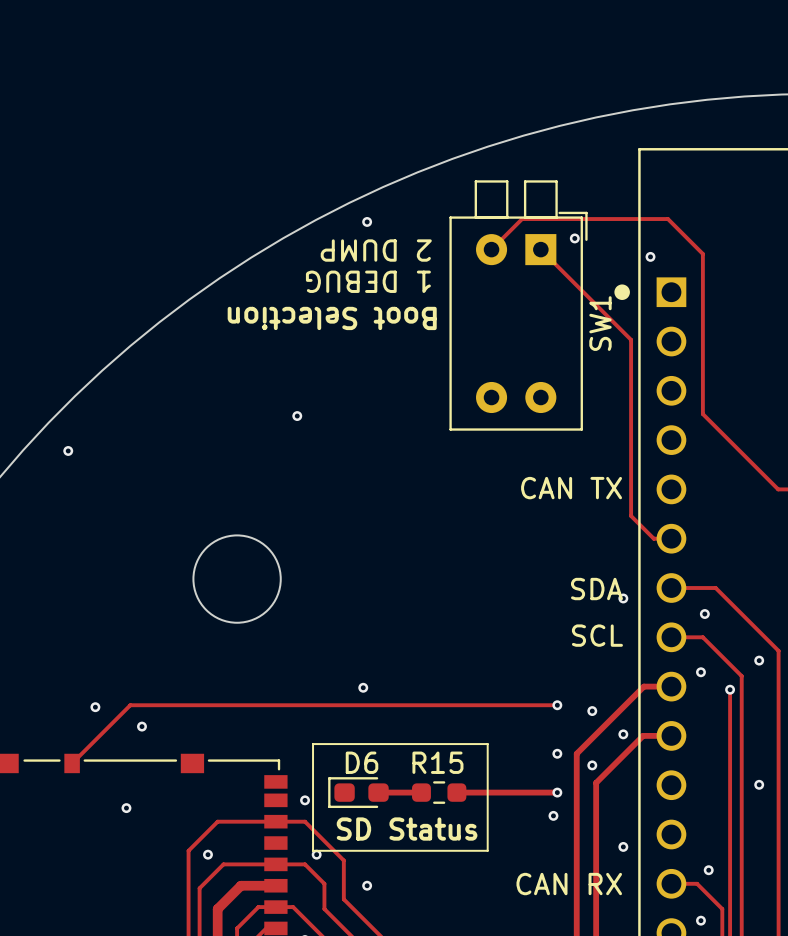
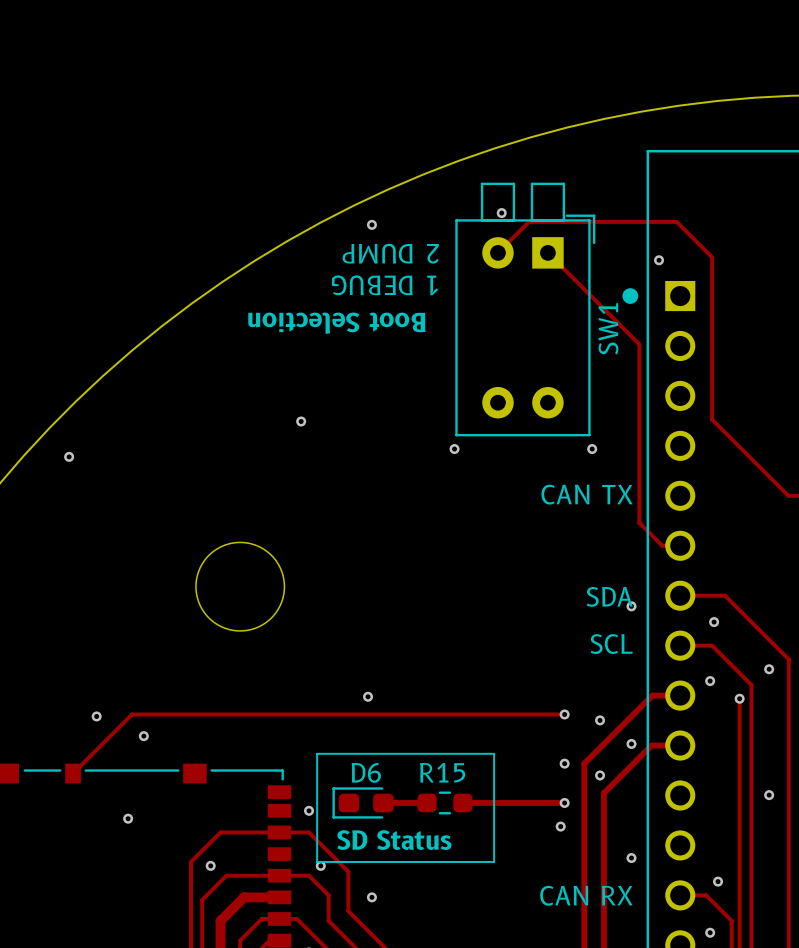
via position: (574, 238) -> (501, 213)
via: none -> (454, 449)
via: none -> (592, 449)

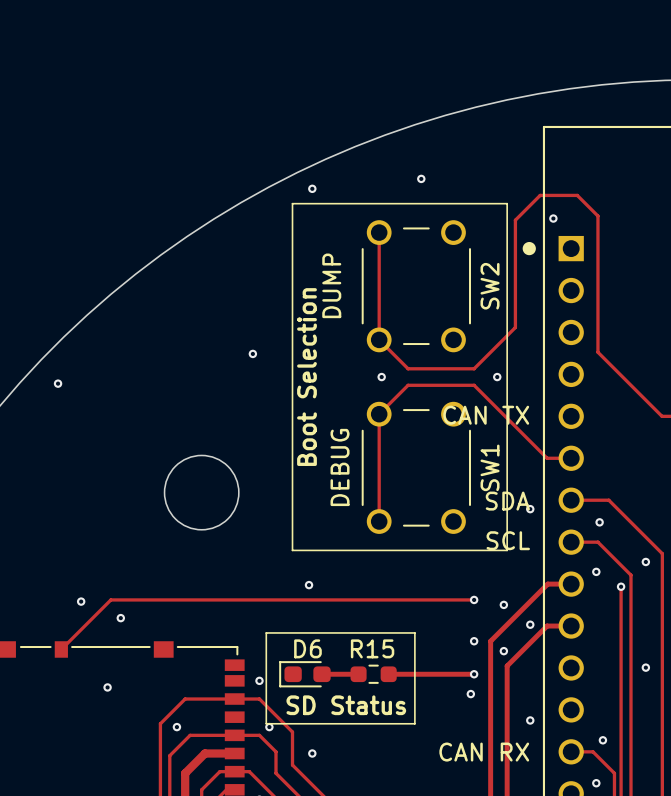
SW1 footprint: [455, 182, 596, 437] -> [361, 401, 471, 534]
track: (687, 232) (676, 221) (528, 221) (497, 252) -> (577, 195) (540, 195) (515, 220) (515, 327) (474, 368) (408, 368) (379, 339) (379, 232)
line: none -> (292, 203) (507, 203) (507, 550) (292, 550) (292, 203)
track: (547, 252) (639, 344) (639, 522) (662, 545) -> (379, 521) (379, 414) (408, 385) (474, 385) (547, 458) (556, 458)
text: 2 DUMP (390, 253) -> none
text: 1 DEBUG (385, 285) -> none
text rotation: 0° (336, 323) -> 90° clockwise (306, 377)
text: none -> DUMP (331, 285)
SW2: none -> (416, 286)
text: none -> DEBUG (340, 467)

